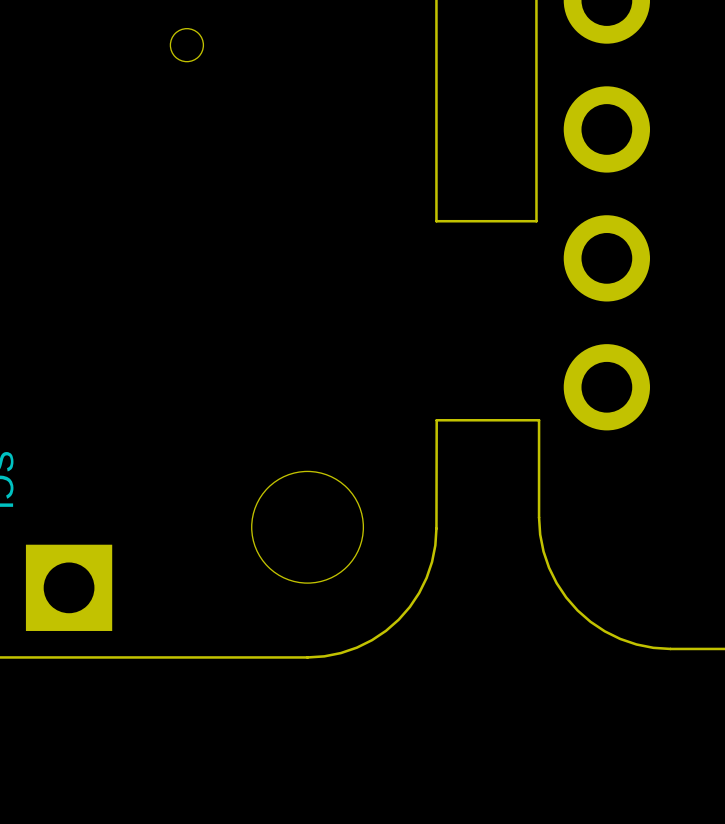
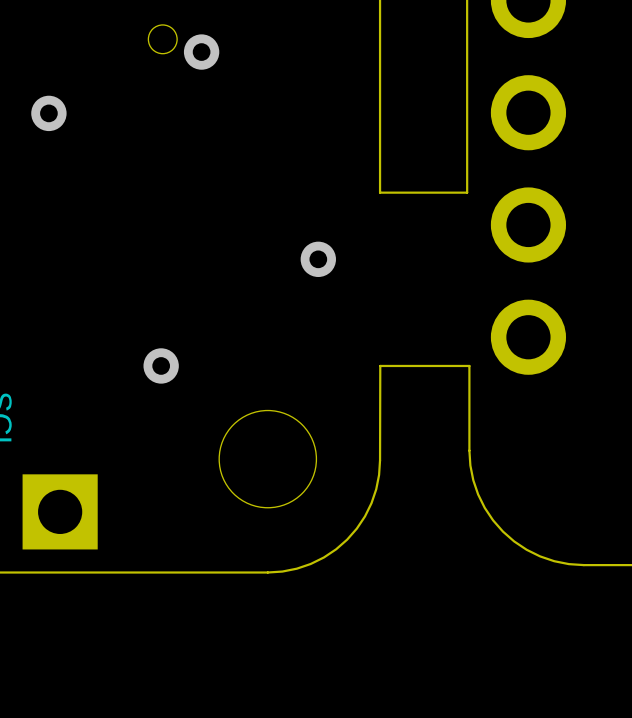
via: none -> (201, 52)
via: none -> (48, 113)
via: none -> (318, 259)
via: none -> (161, 365)

